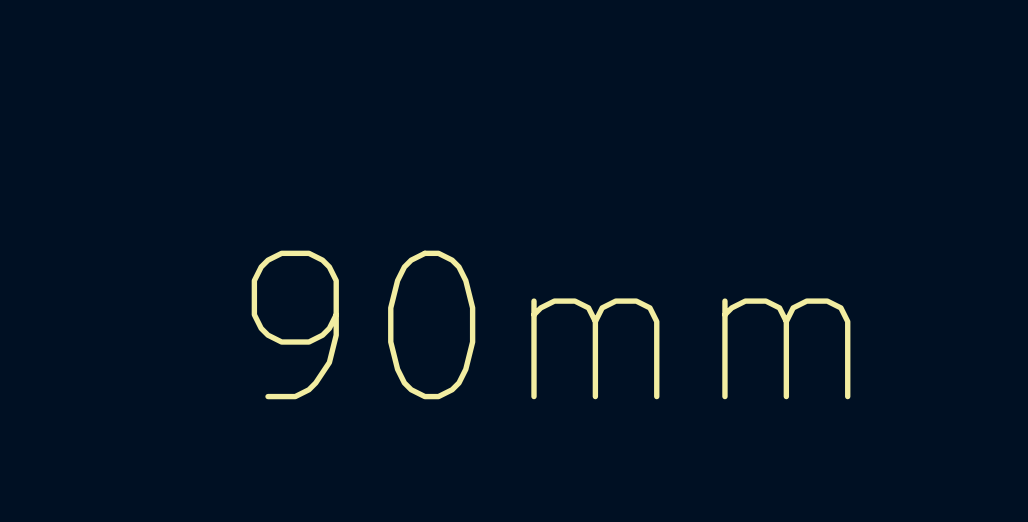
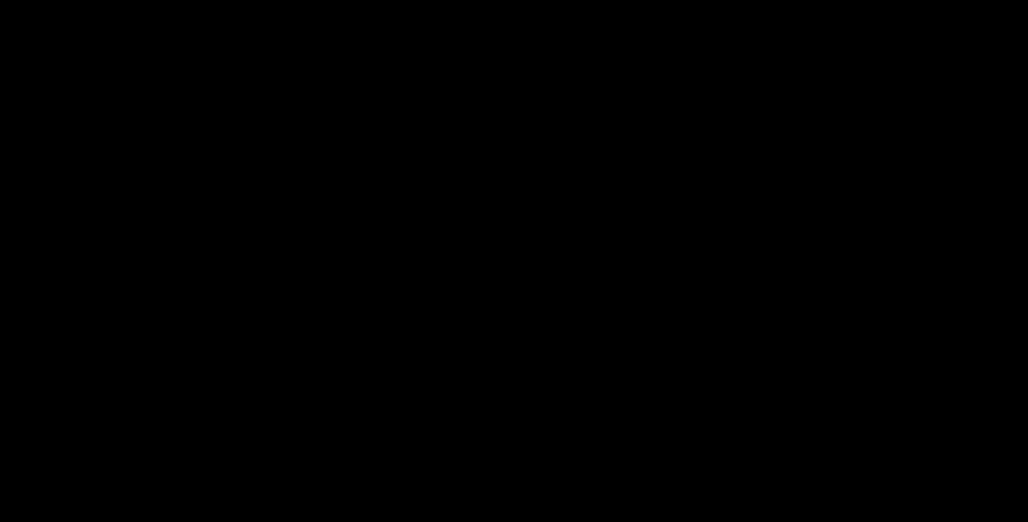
text: 90mm (551, 324) -> none

